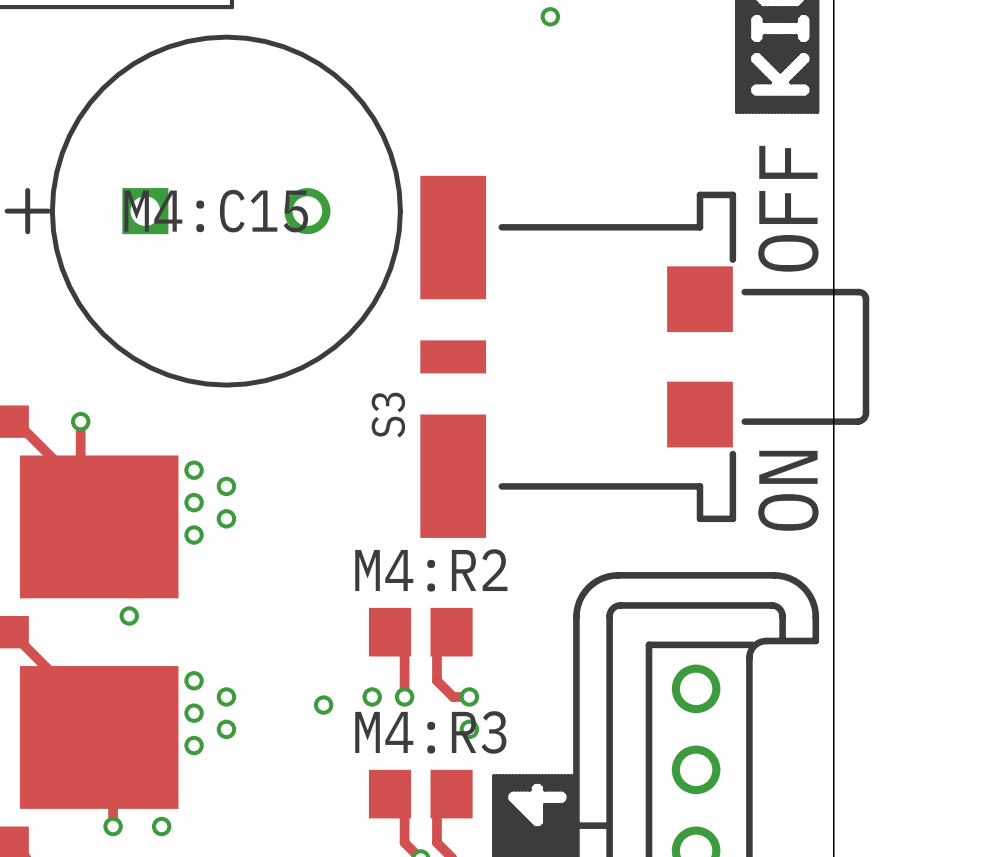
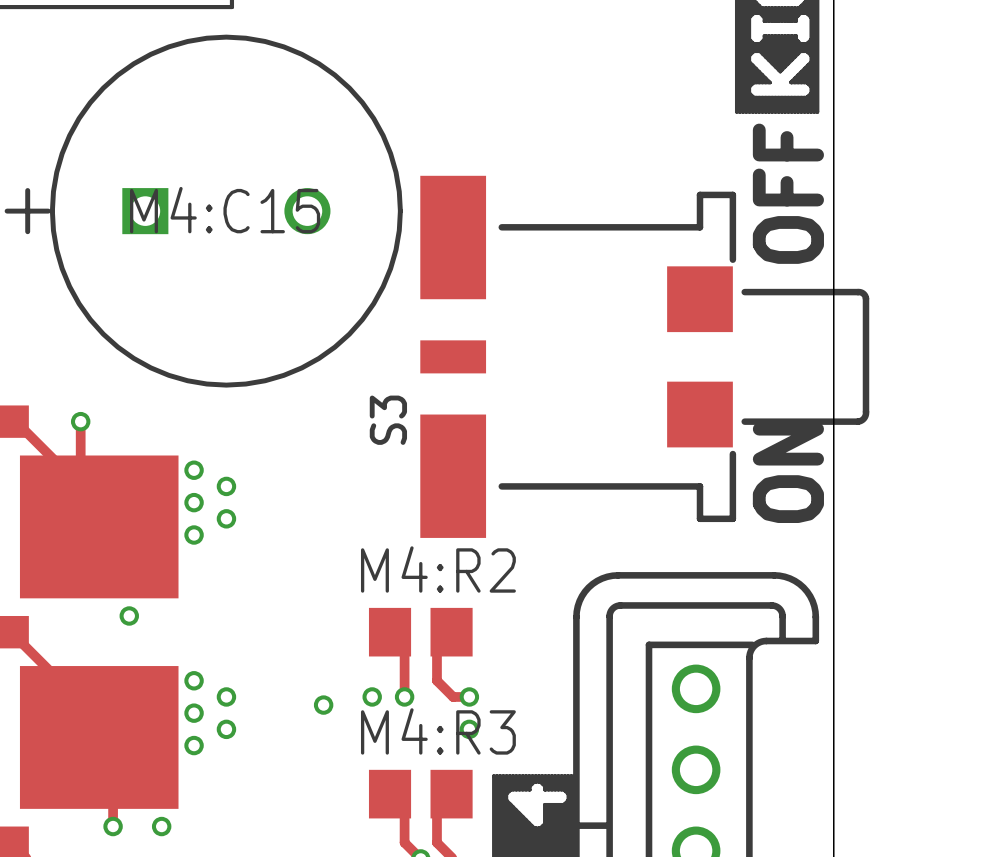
via: (550, 16) -> none

